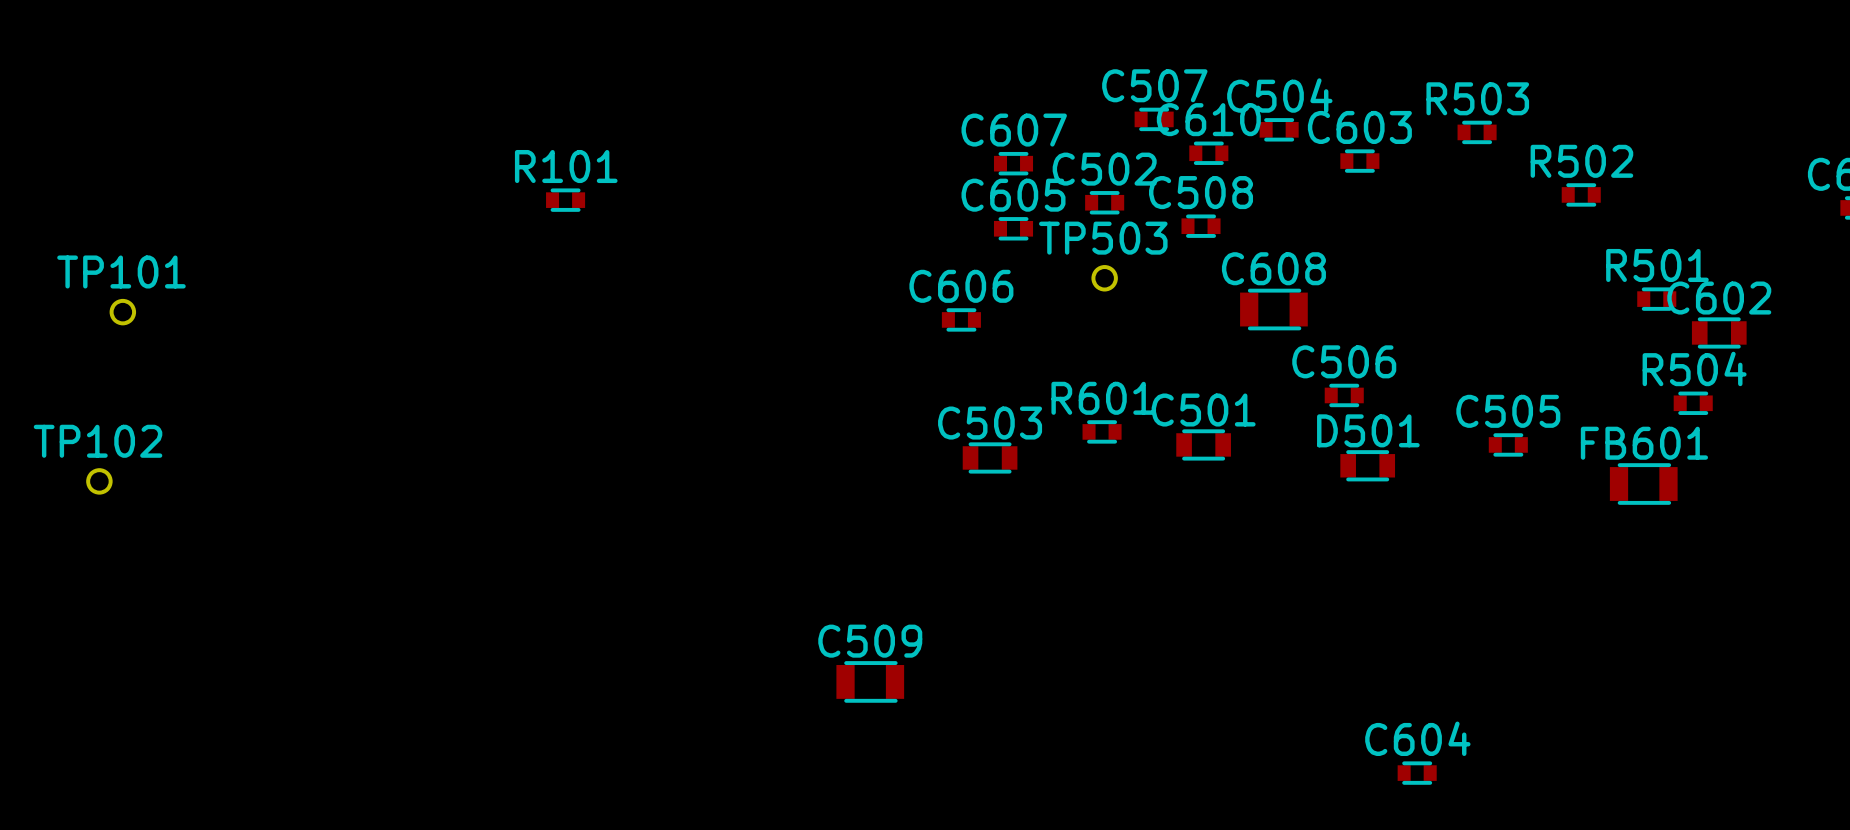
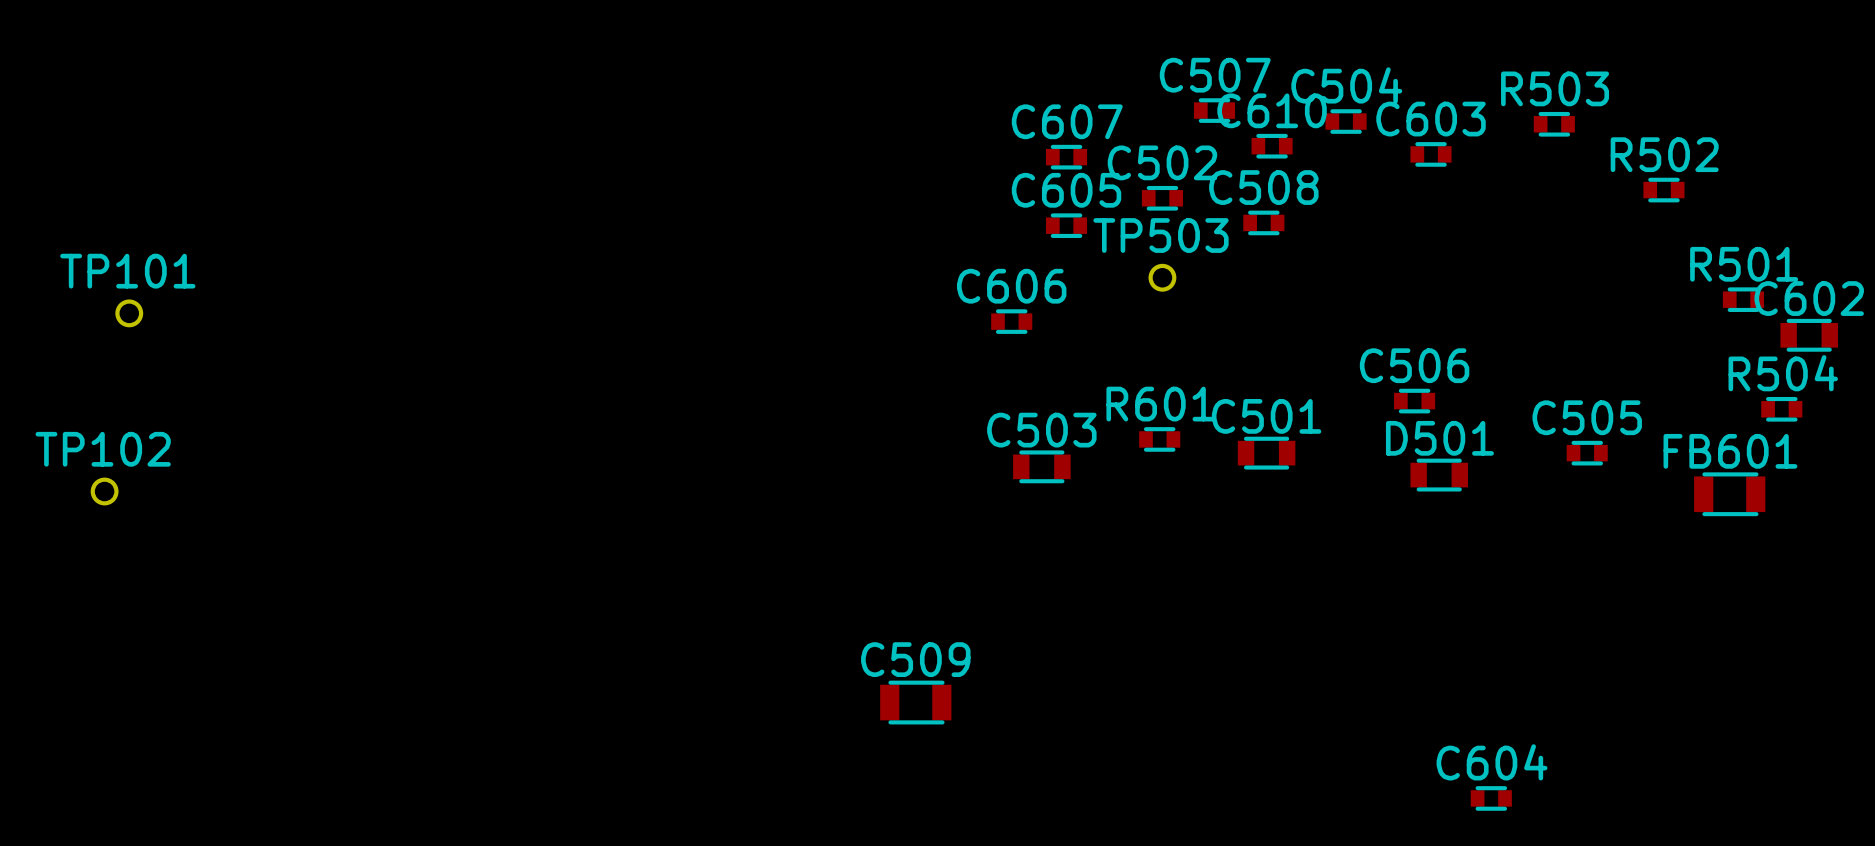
R101: (565, 200) -> none
C608: (1273, 309) -> none

